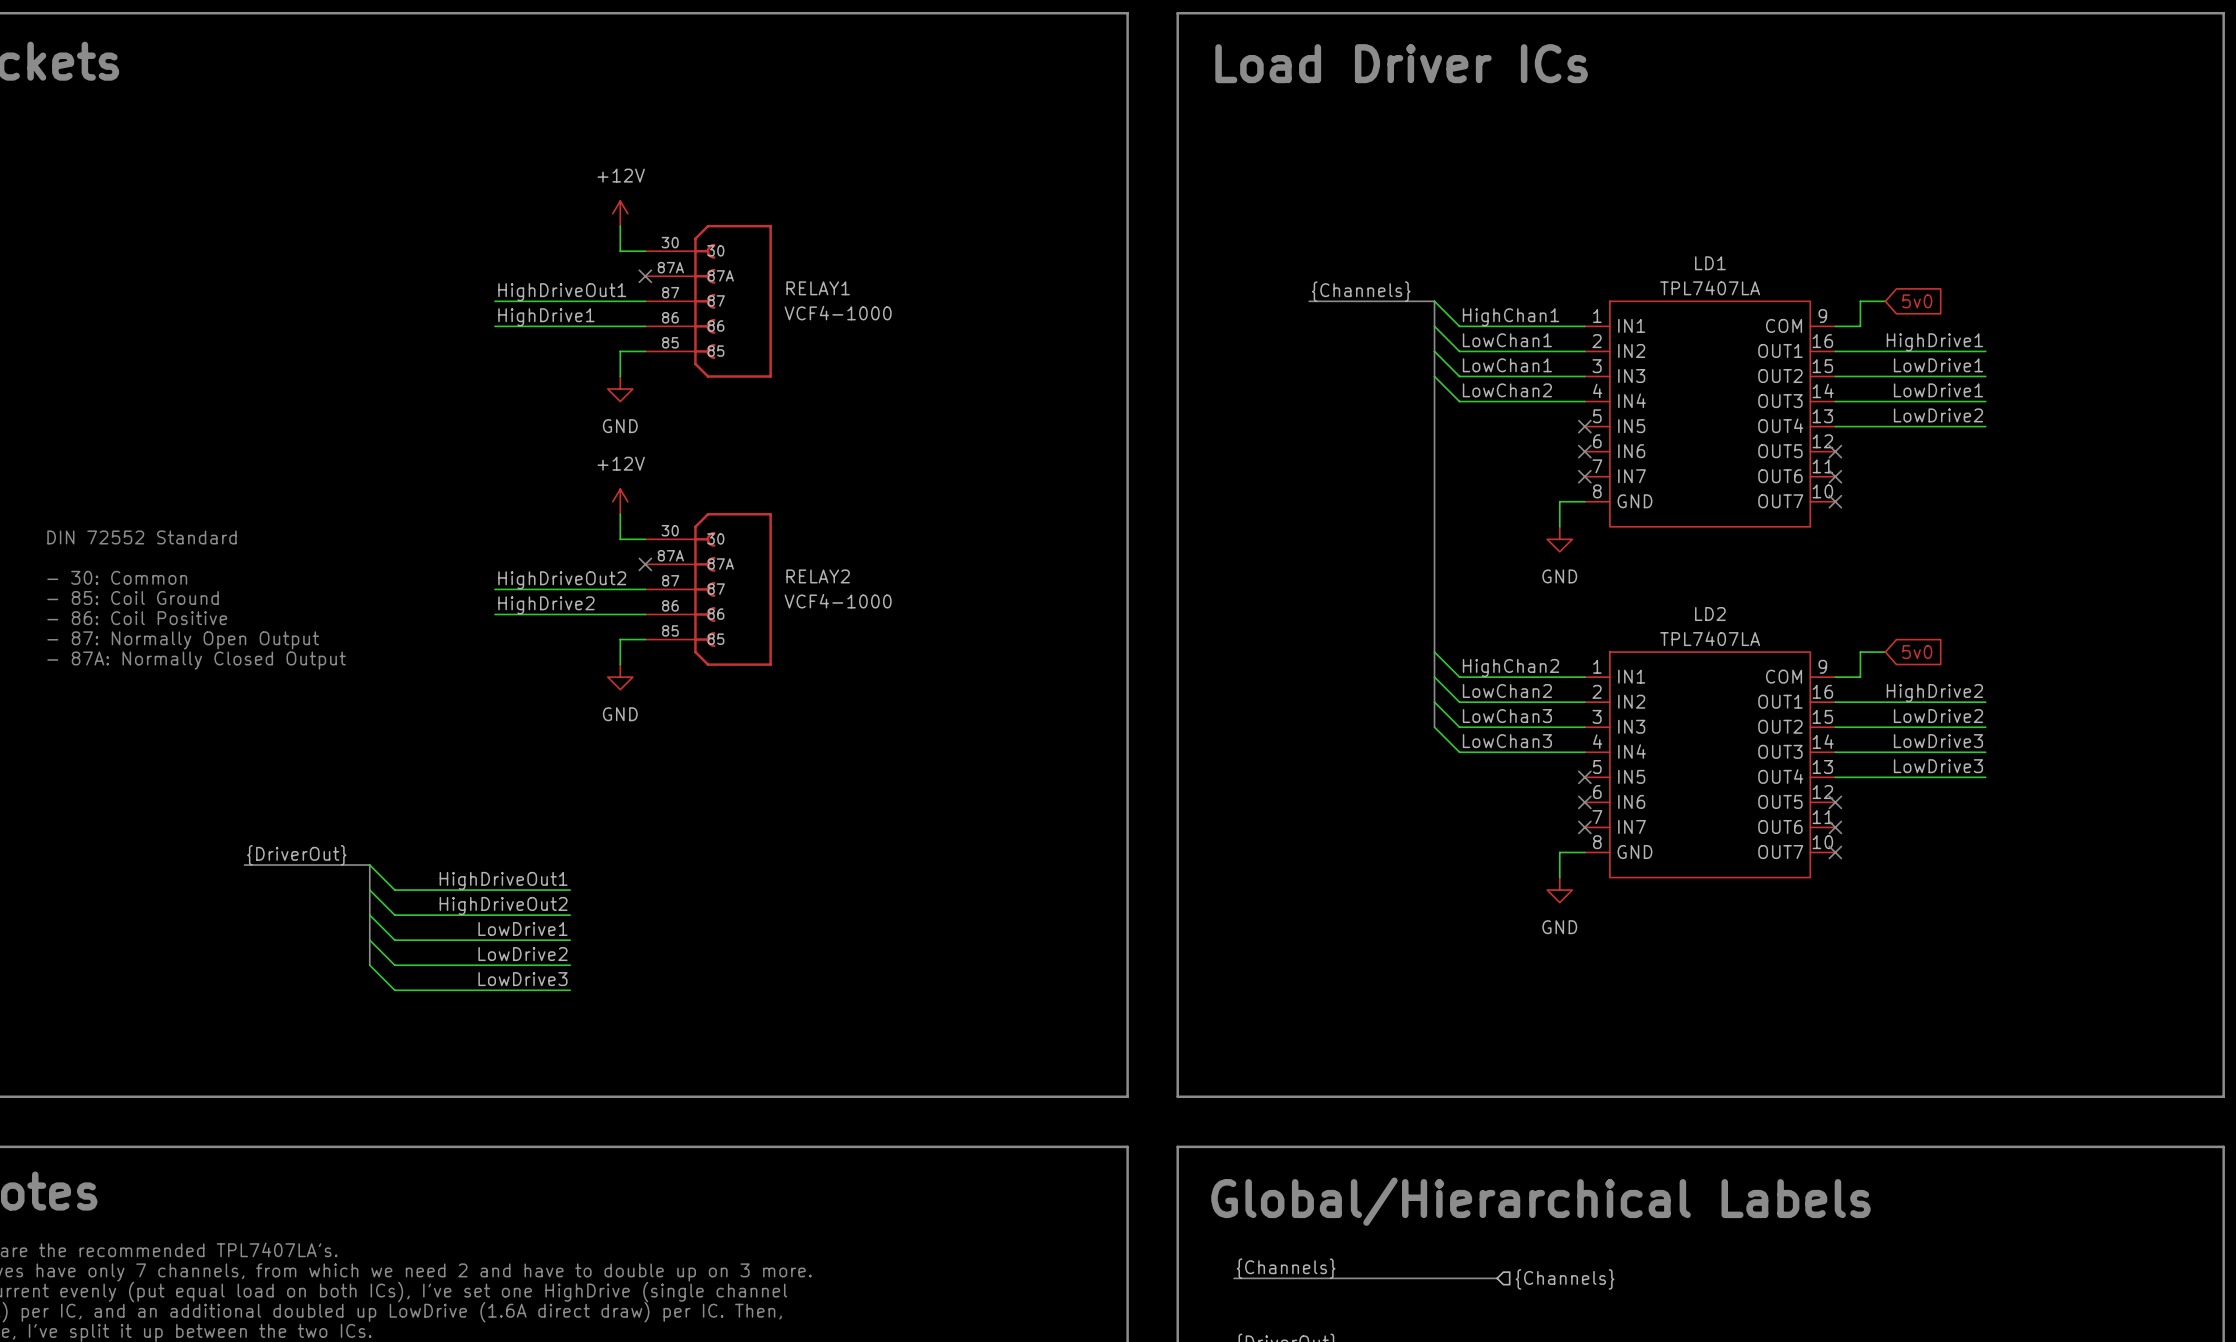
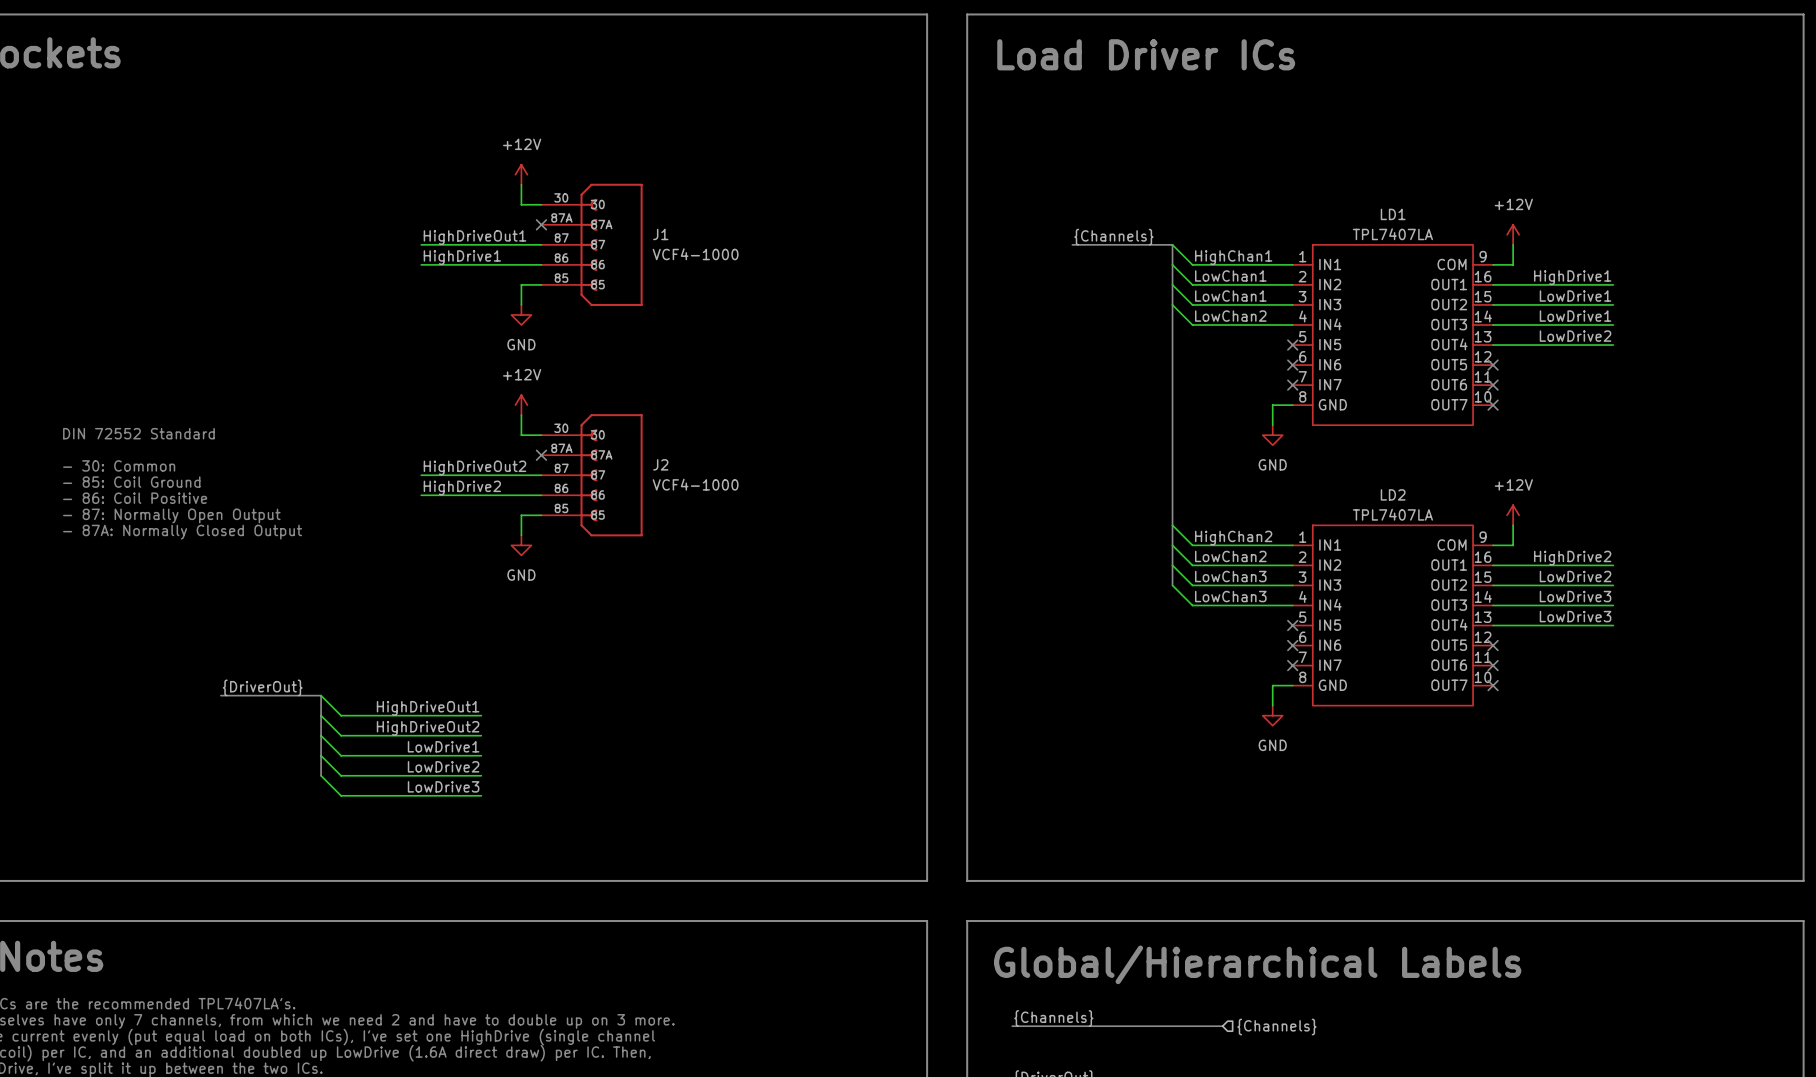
RELAY1 name: RELAY1 (818, 288) -> J1 (660, 234)
power symbol: none -> +12V (1513, 234)
wire: (1860, 301) (1885, 301) -> none
global label: 5v0 (1917, 301) -> none
RELAY2 name: RELAY2 (818, 576) -> J2 (660, 464)
power symbol: none -> +12V (1513, 515)
wire: (1860, 652) (1885, 652) -> none
global label: 5v0 (1917, 652) -> none

